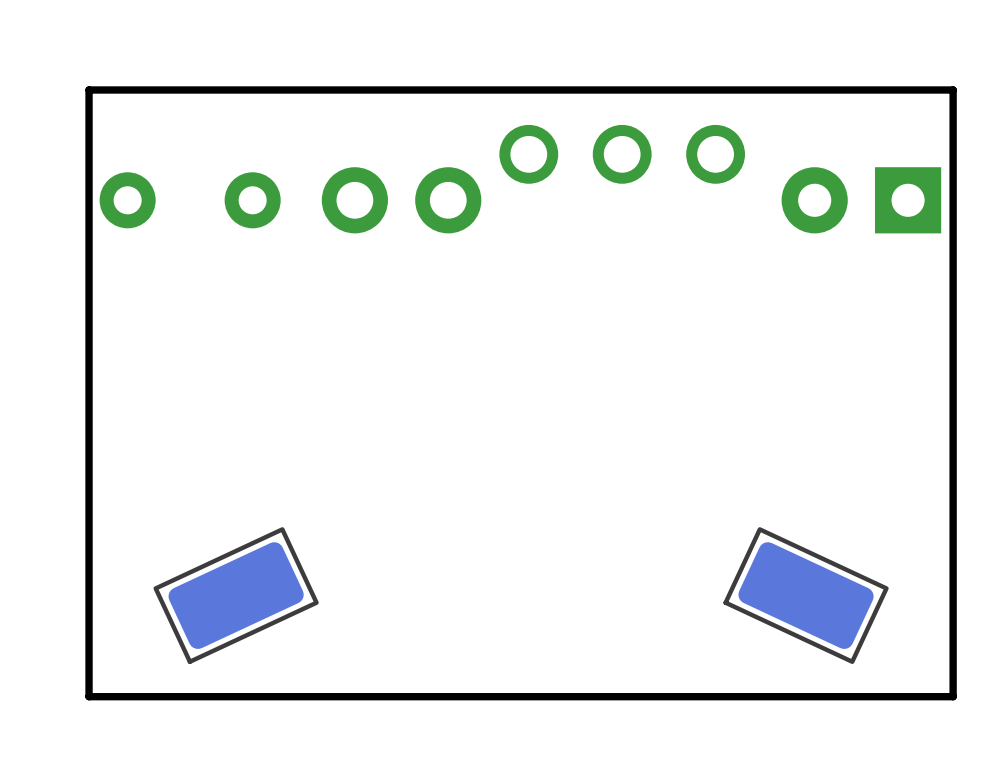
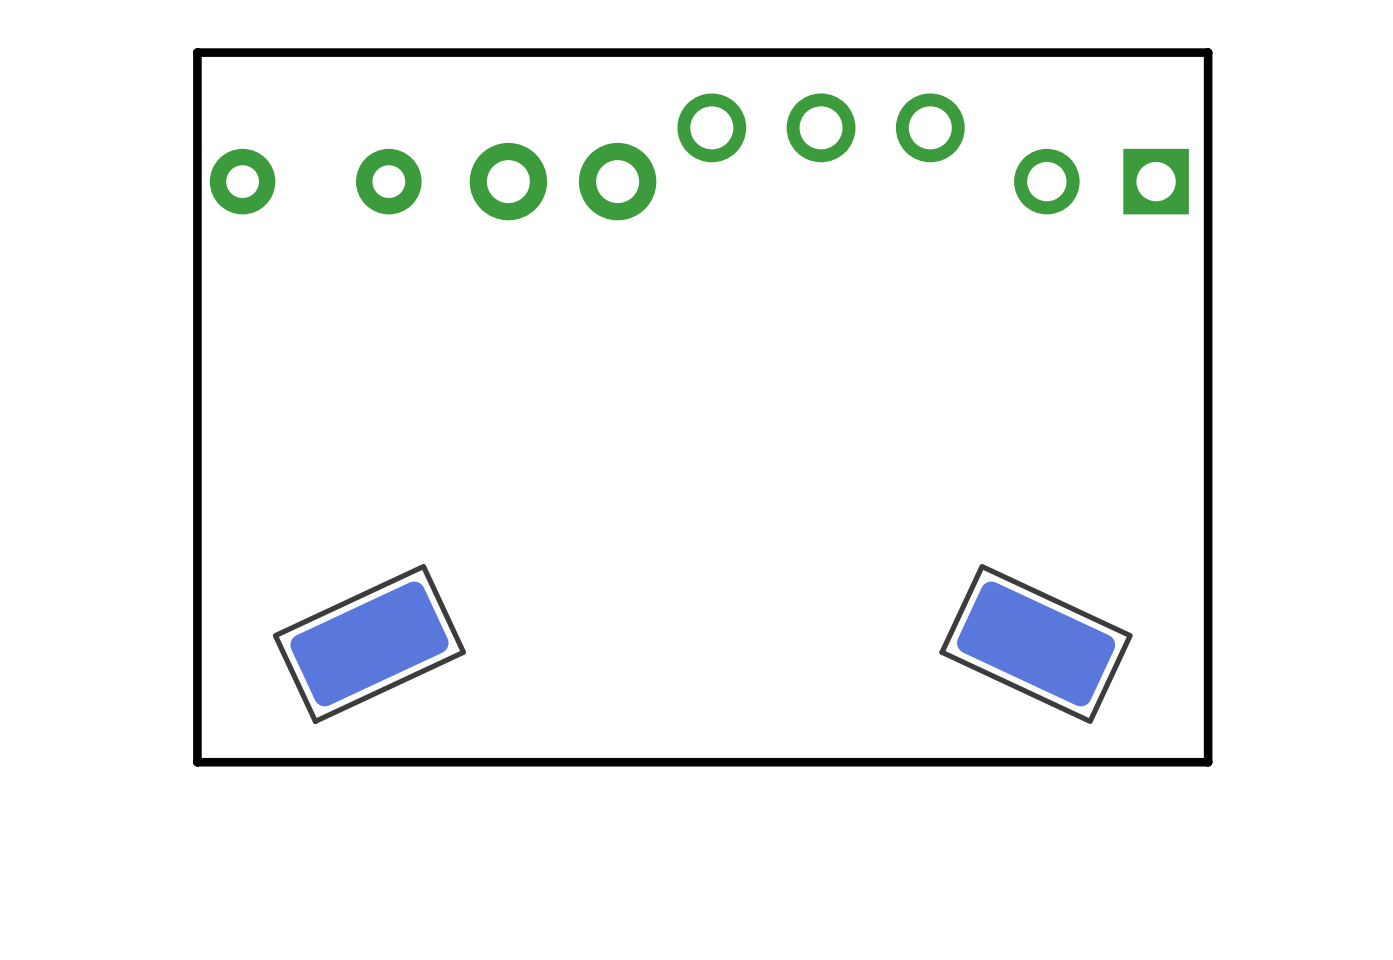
part footprint: [781, 167, 942, 234] -> [1014, 148, 1189, 215]

